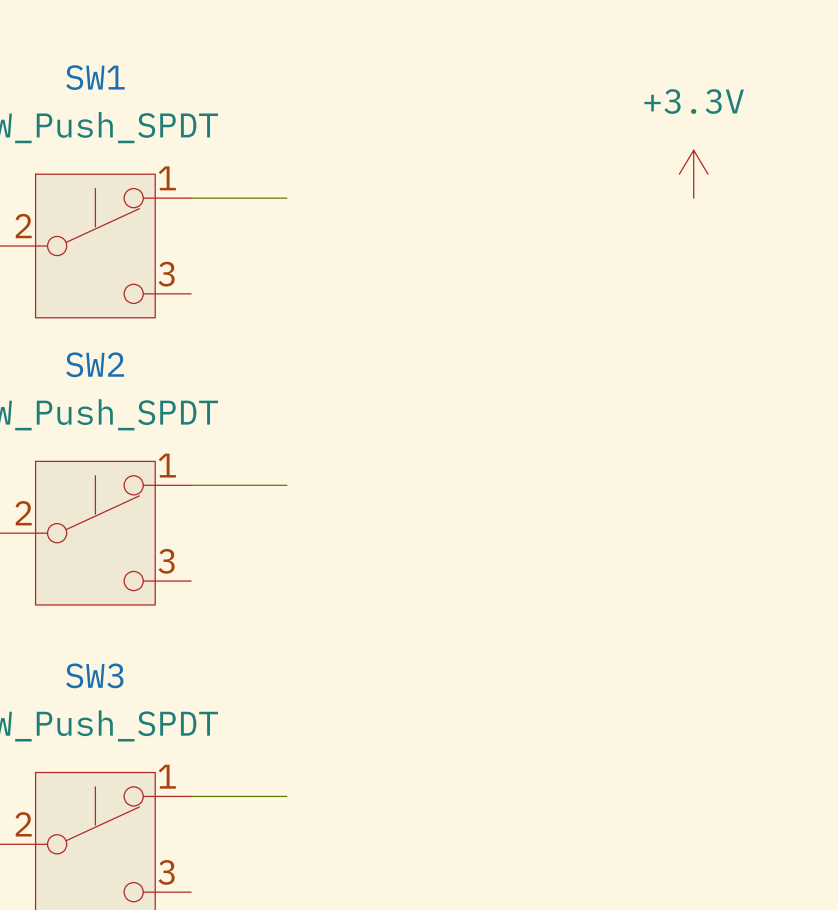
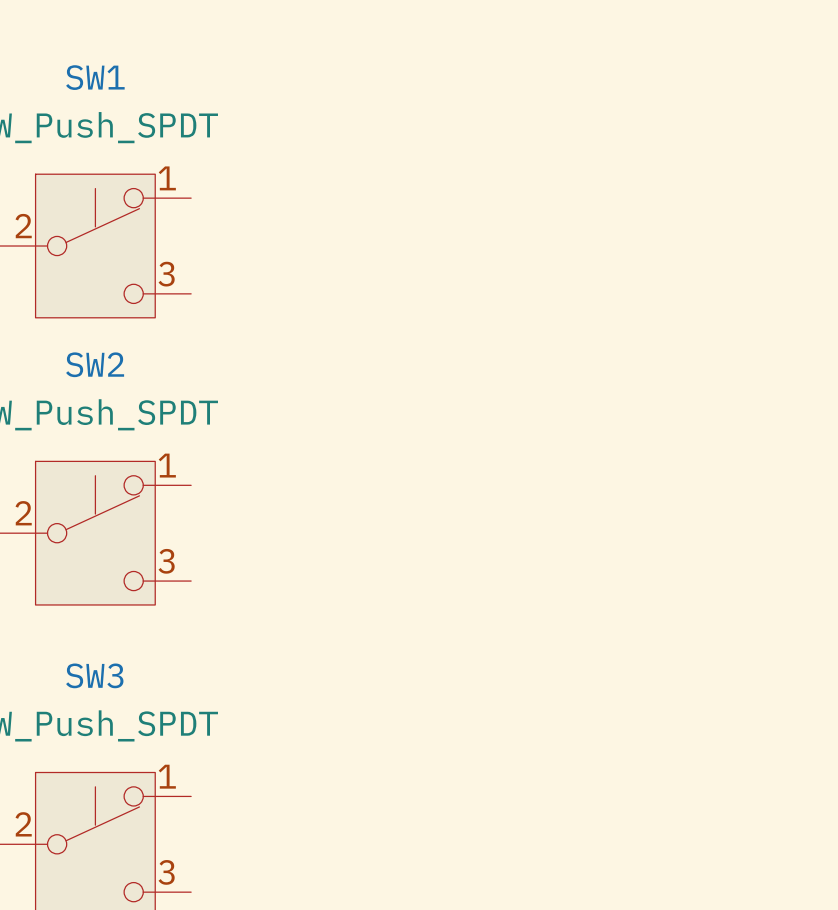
power symbol: +3.3V (693, 174) -> none
wire: (191, 198) (286, 198) -> none
wire: (191, 485) (286, 485) -> none
wire: (191, 796) (286, 796) -> none

